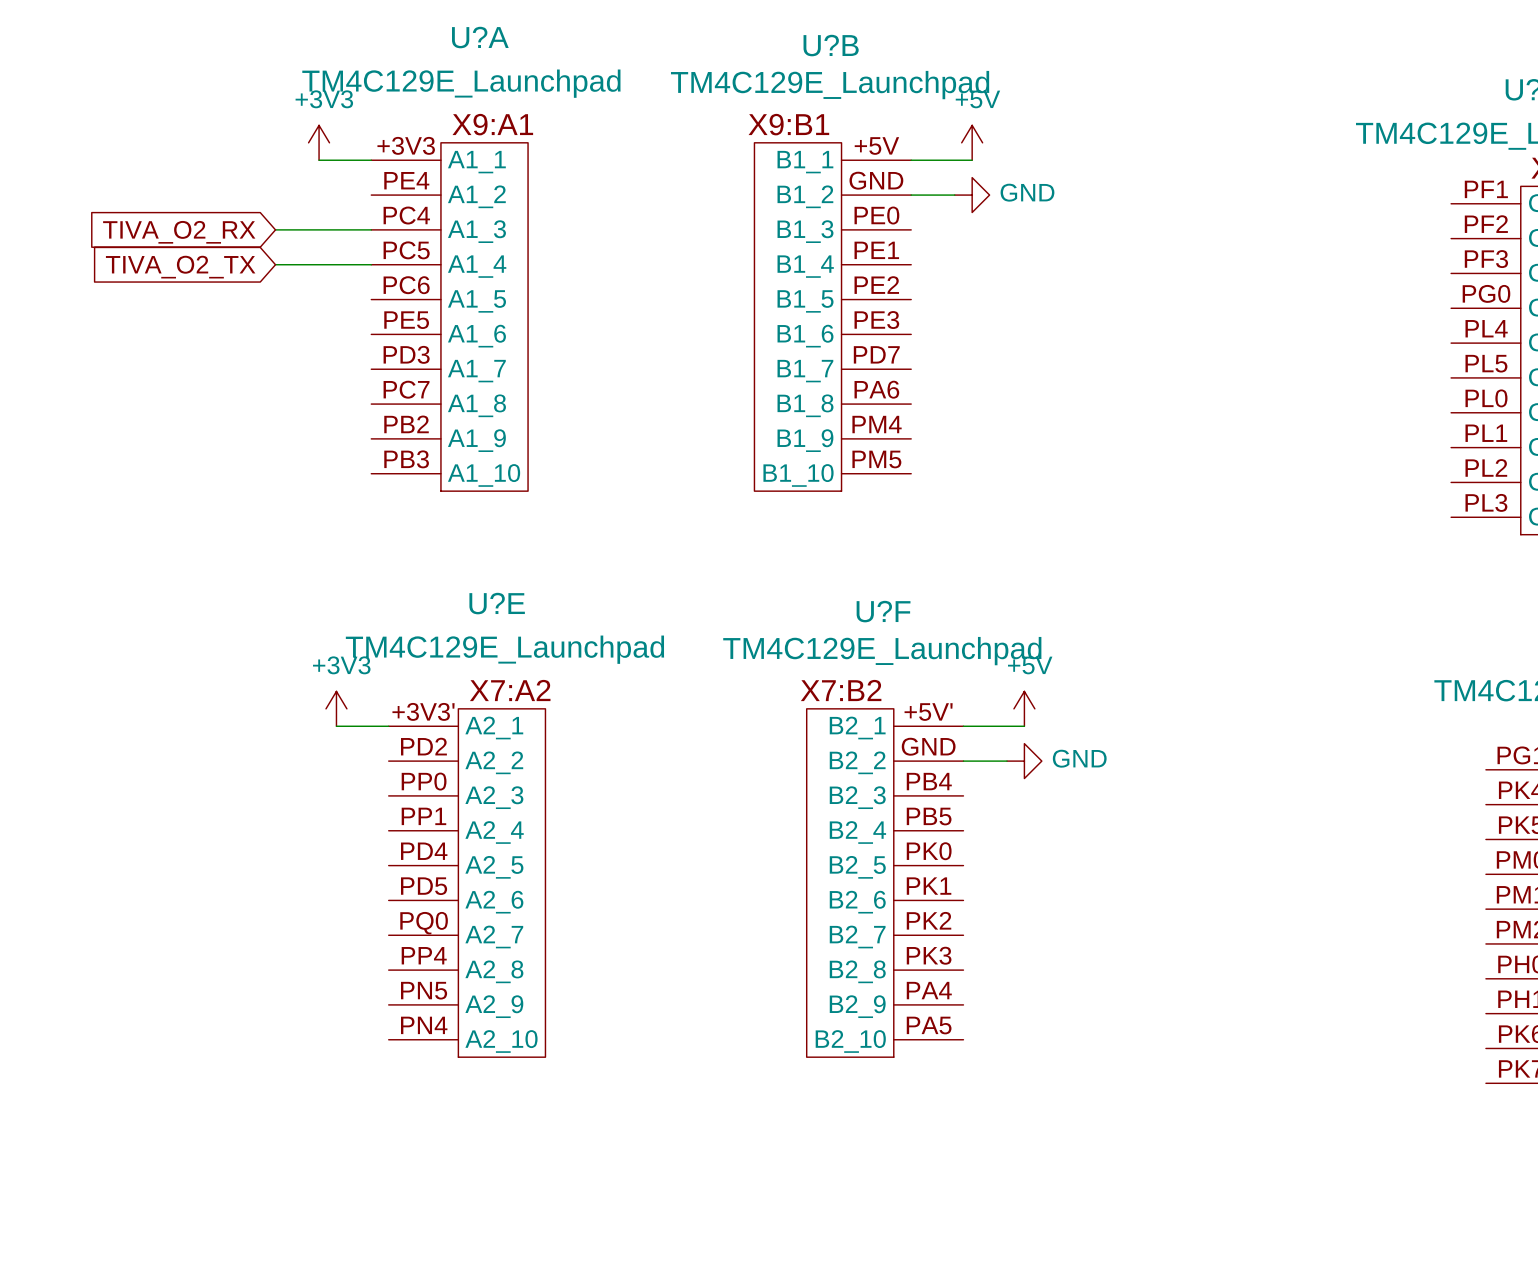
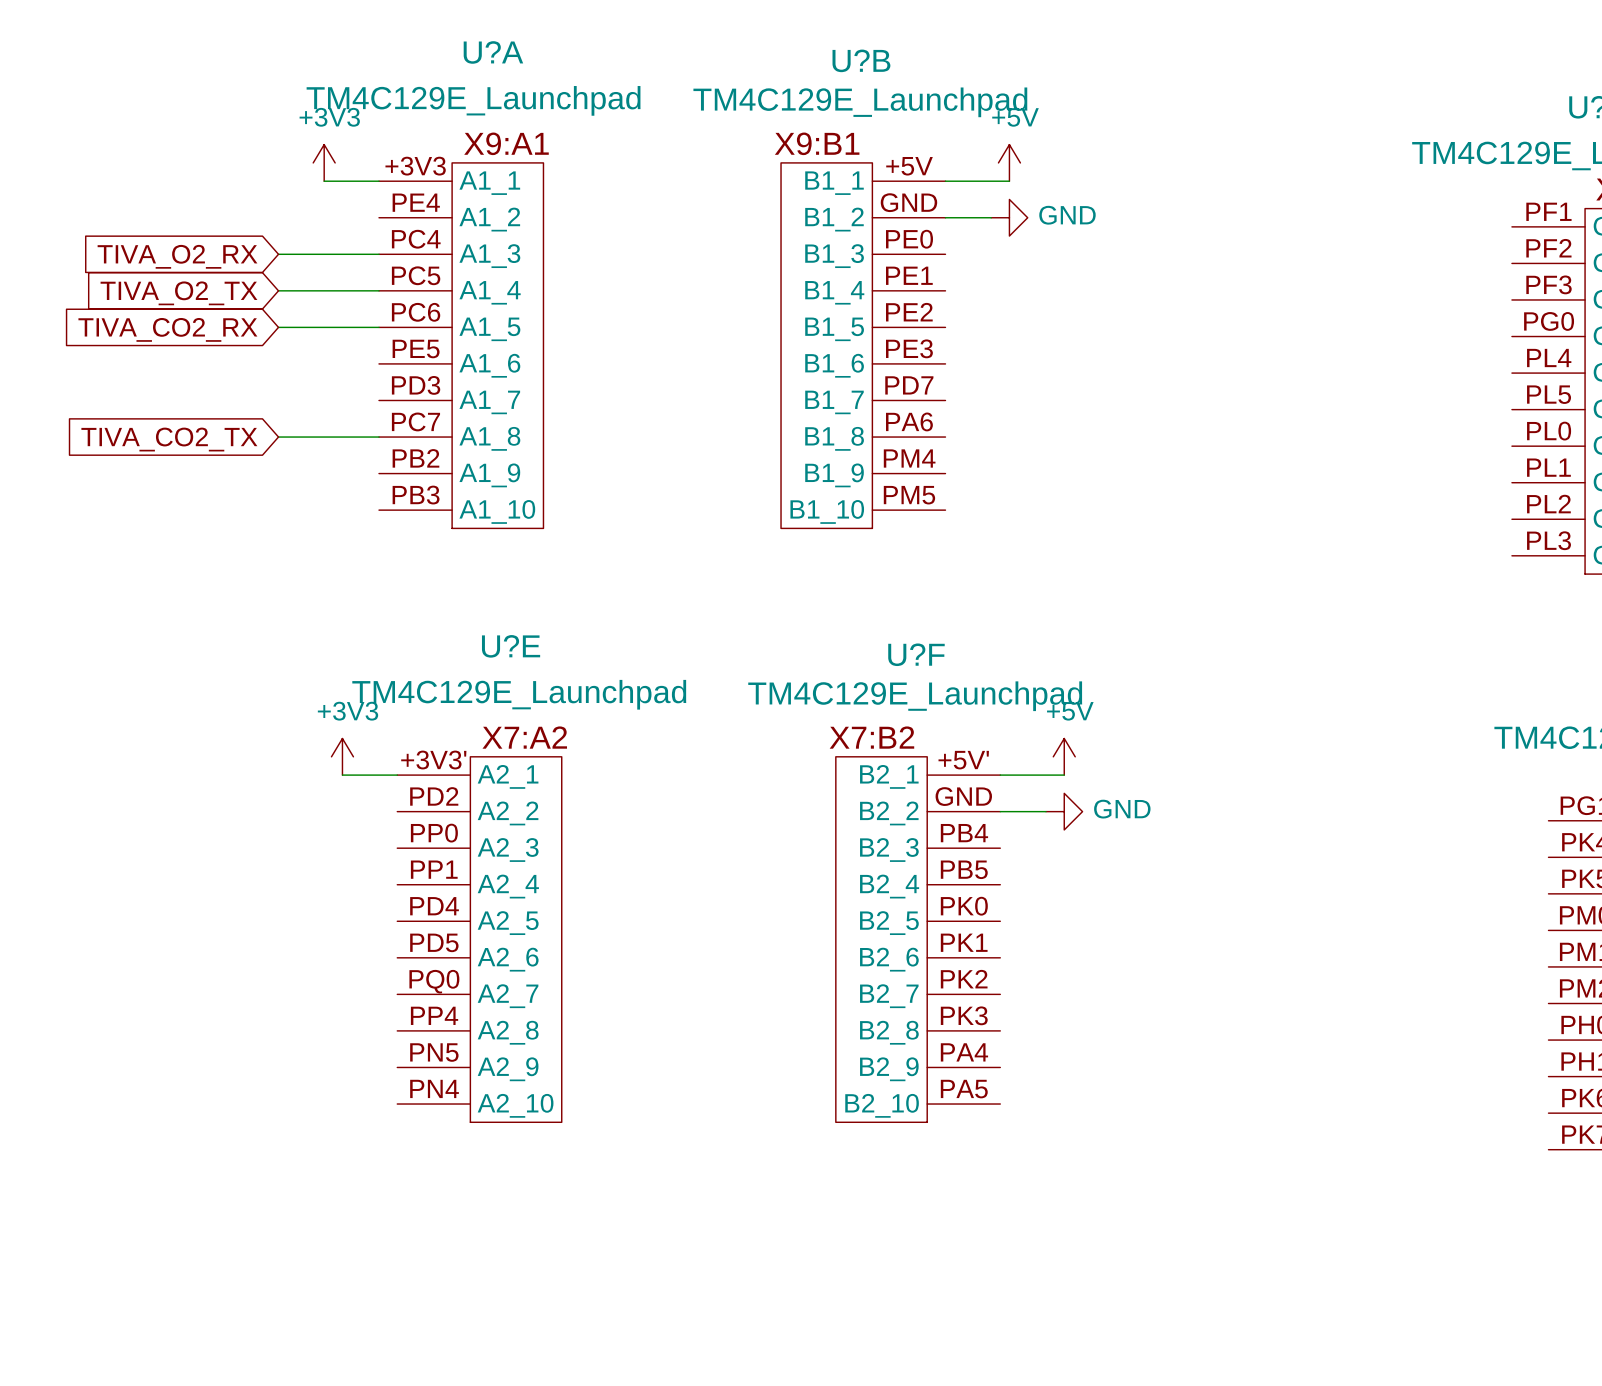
wire: none -> (278, 327) (379, 327)
global label: none -> TIVA_CO2_RX (167, 329)
wire: none -> (278, 437) (379, 437)
global label: none -> TIVA_CO2_TX (169, 439)

